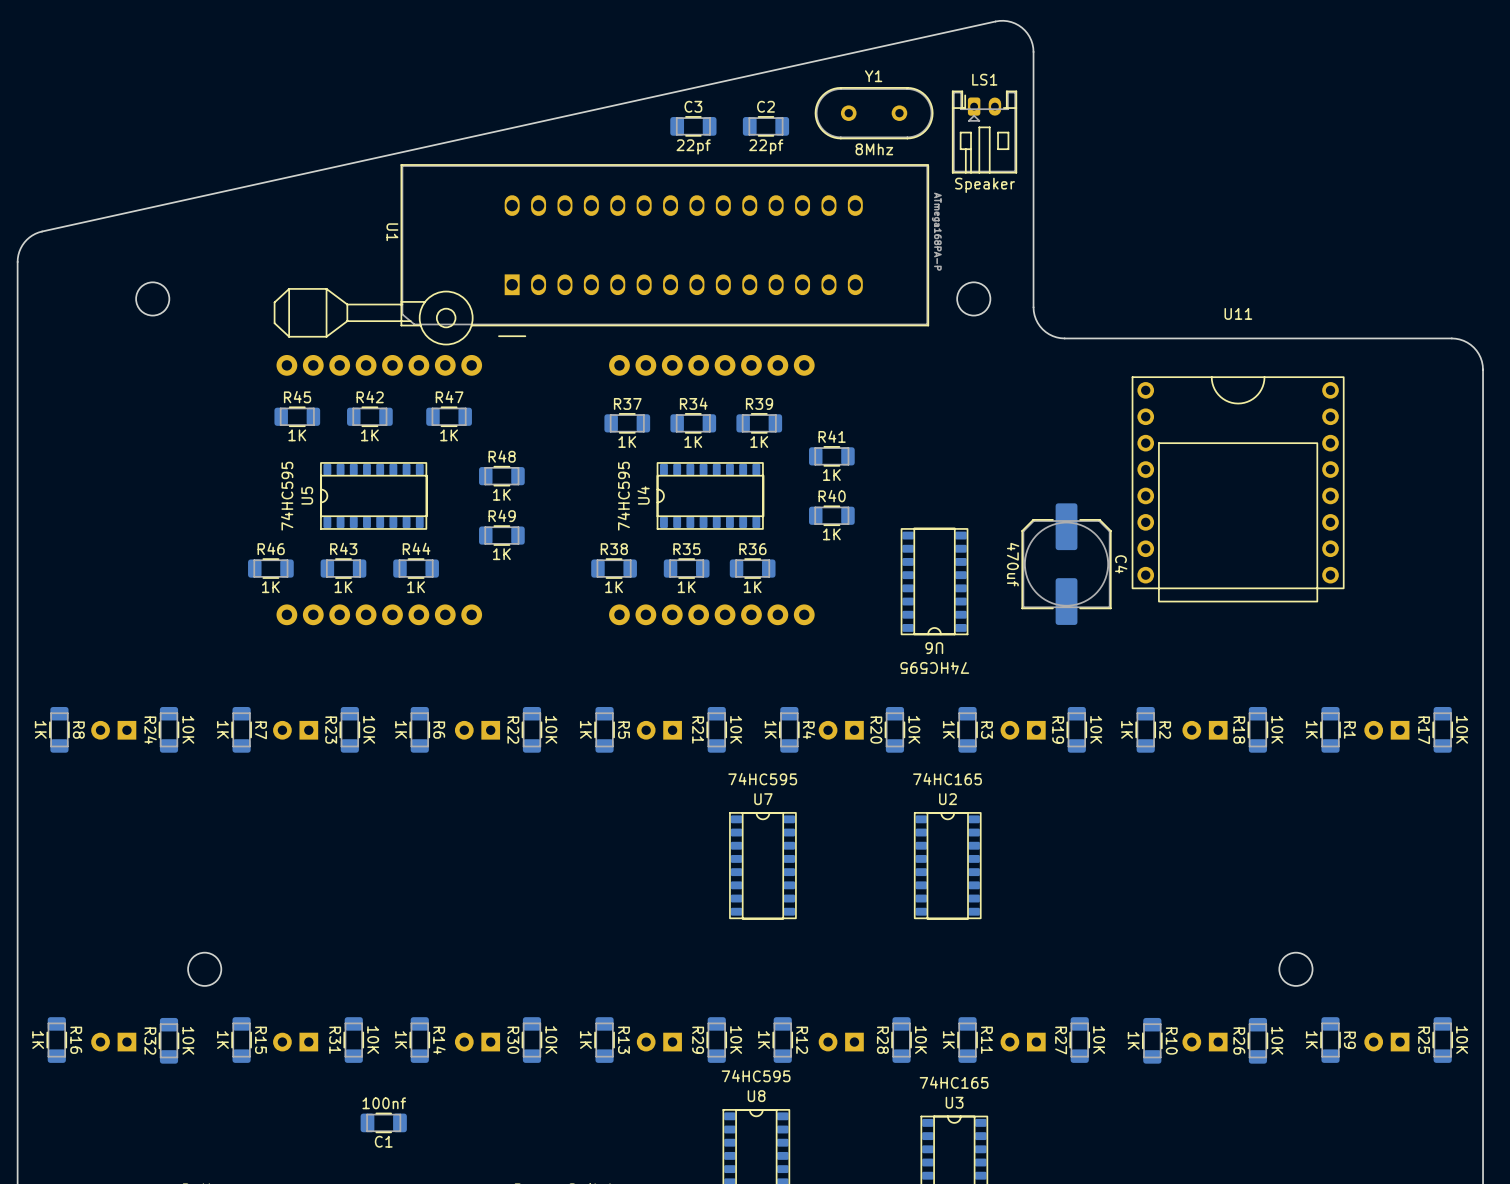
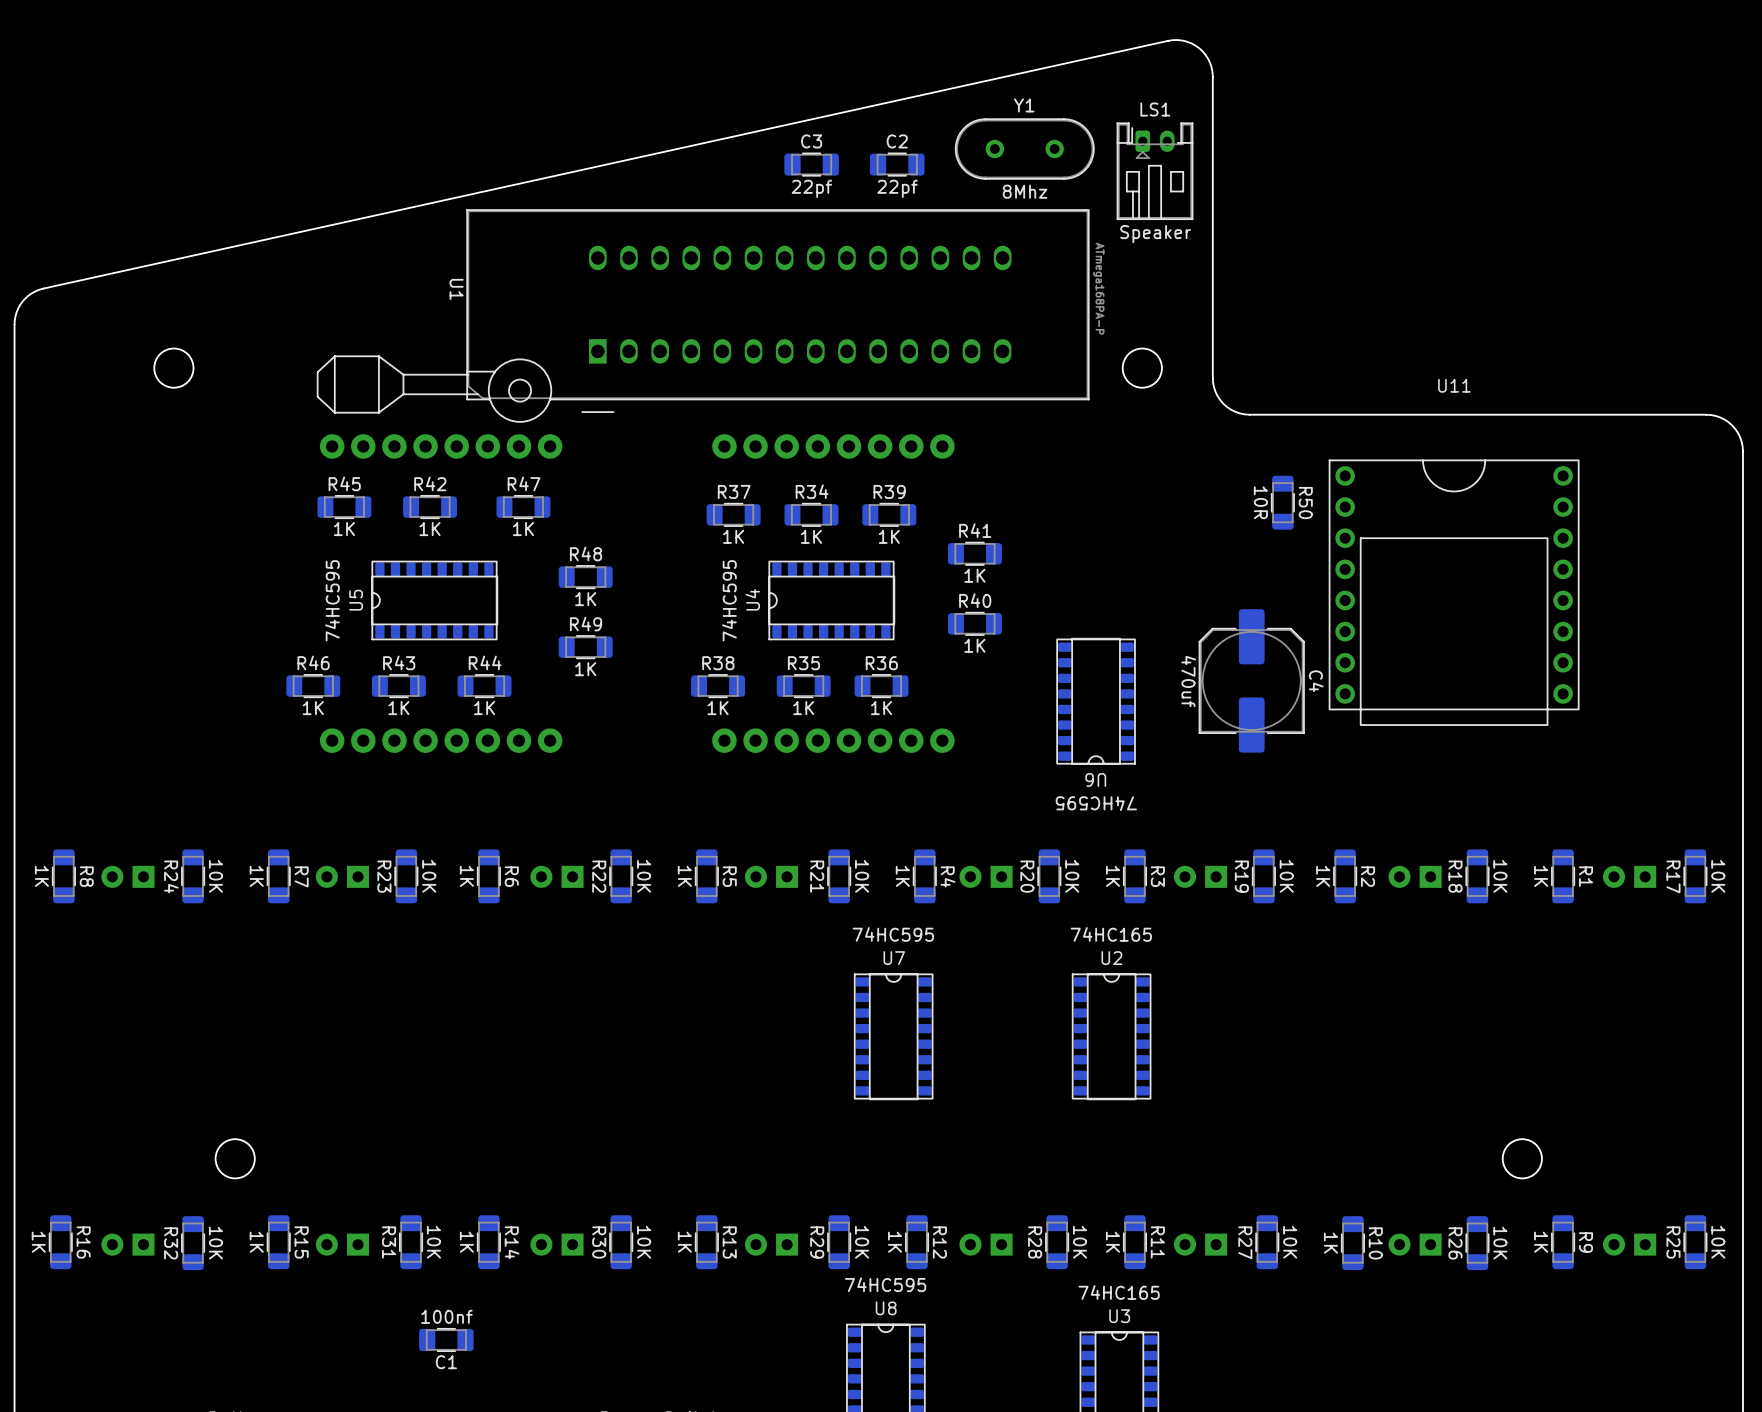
R50: none -> 10R (1282, 502)

